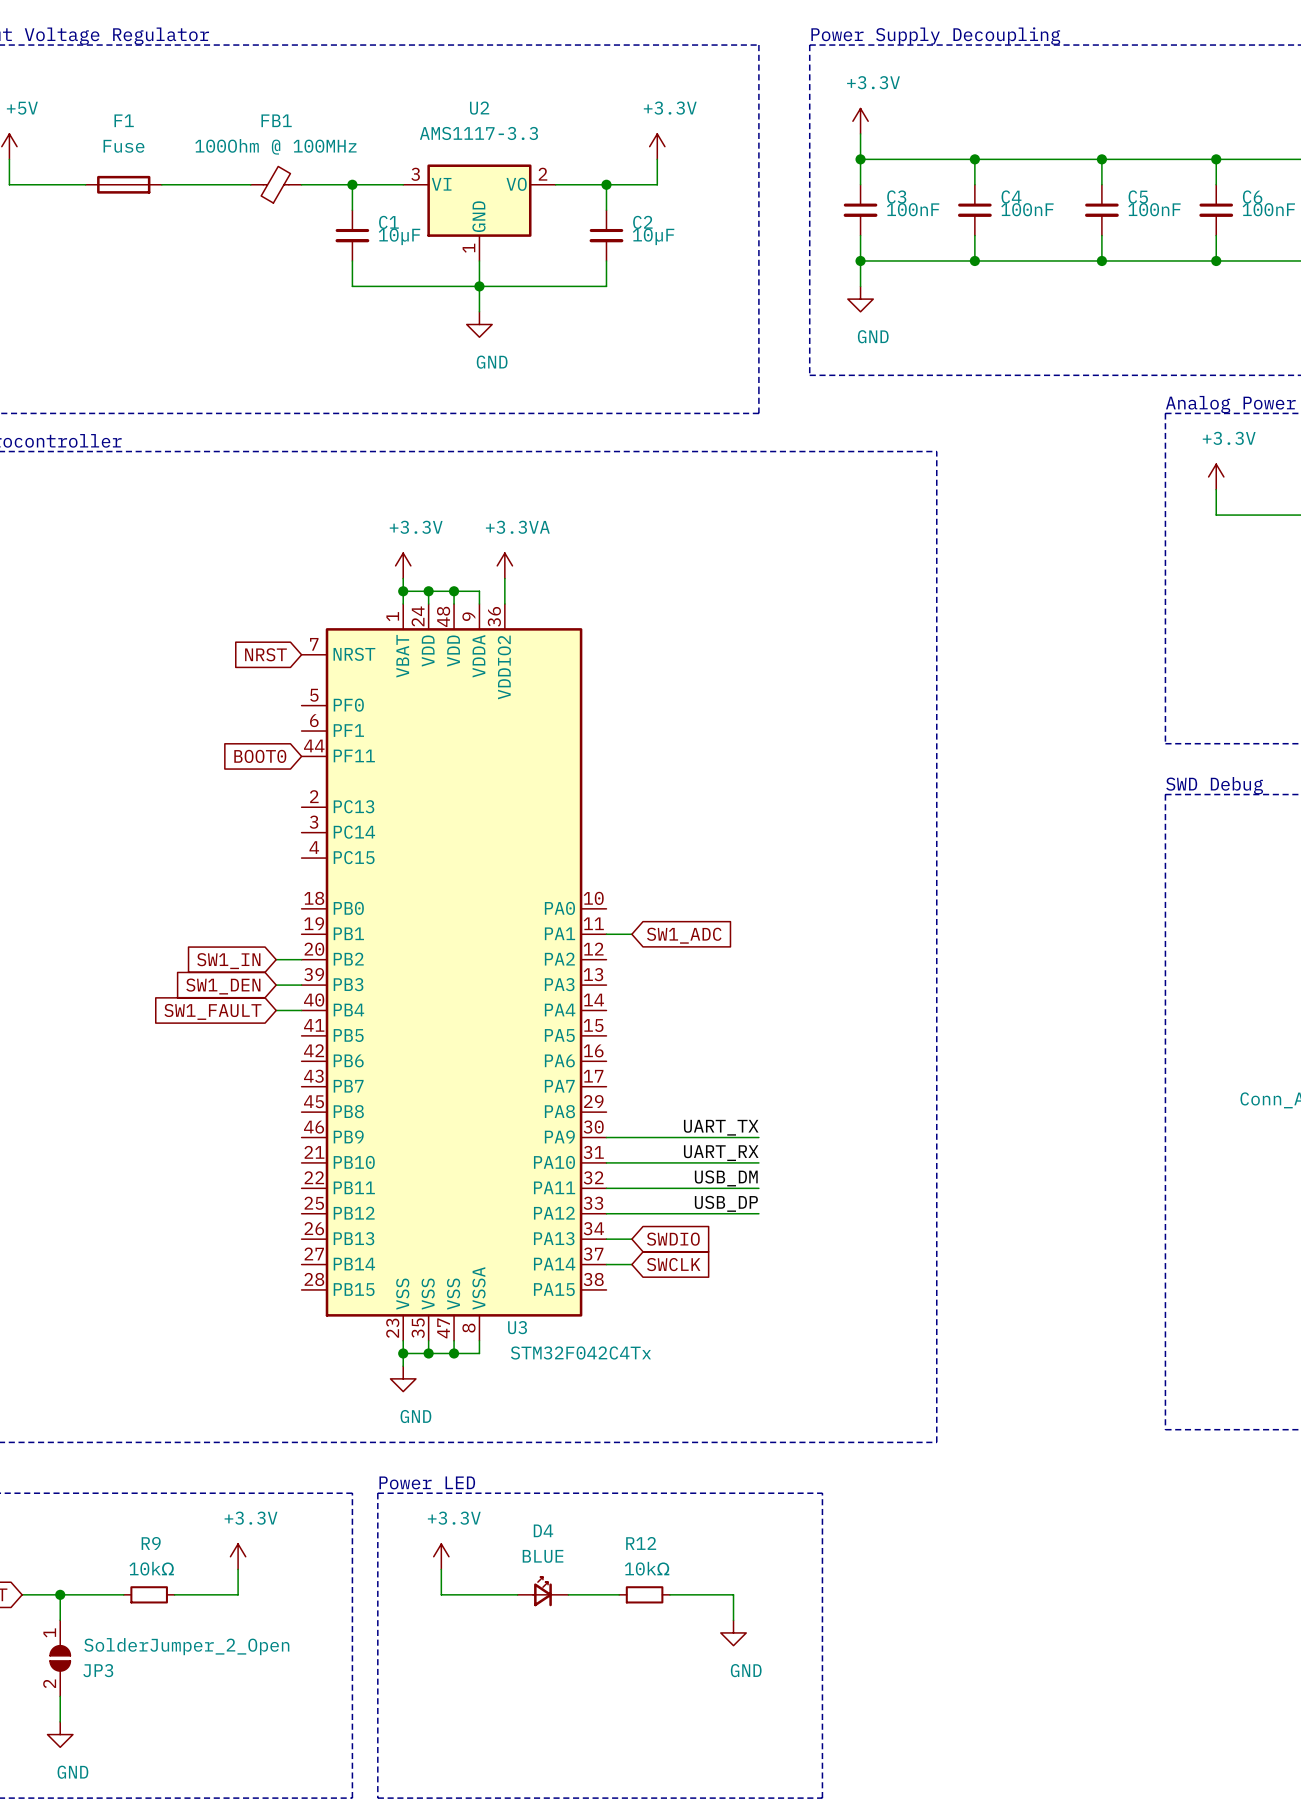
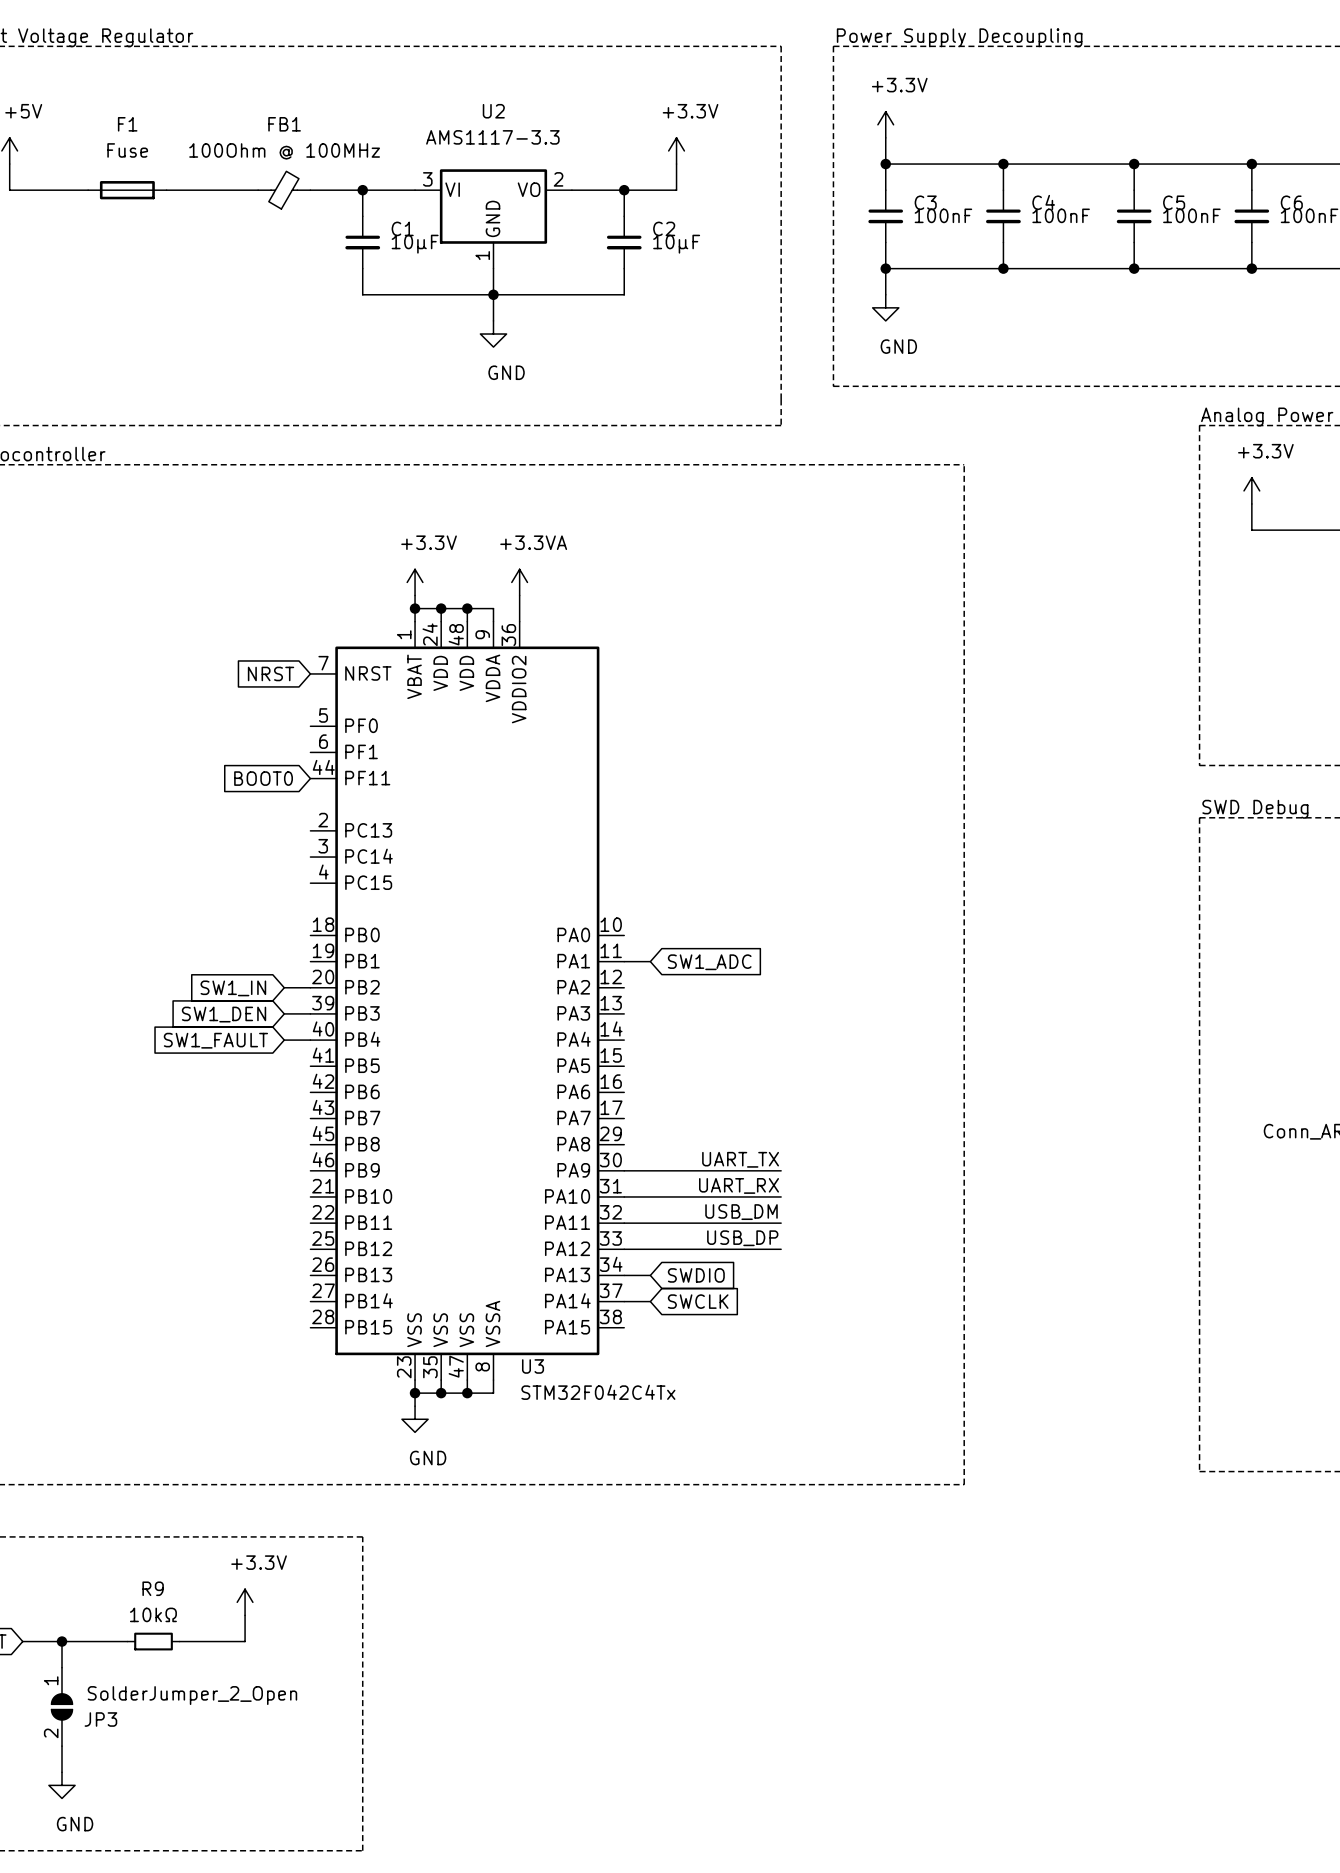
text: Power LED (427, 1482) -> none
line: (377, 1493) (377, 1798) (822, 1798) (822, 1493) (377, 1493) -> none
power symbol: +3.3V (441, 1556) -> none
wire: (441, 1569) (441, 1594) (517, 1594) -> none
D4: BLUE (542, 1591) -> none
wire: (568, 1594) (619, 1594) -> none
R12: 10kΩ (644, 1594) -> none
wire: (669, 1594) (733, 1594) (733, 1620) -> none
power symbol: GND (733, 1632) -> none

